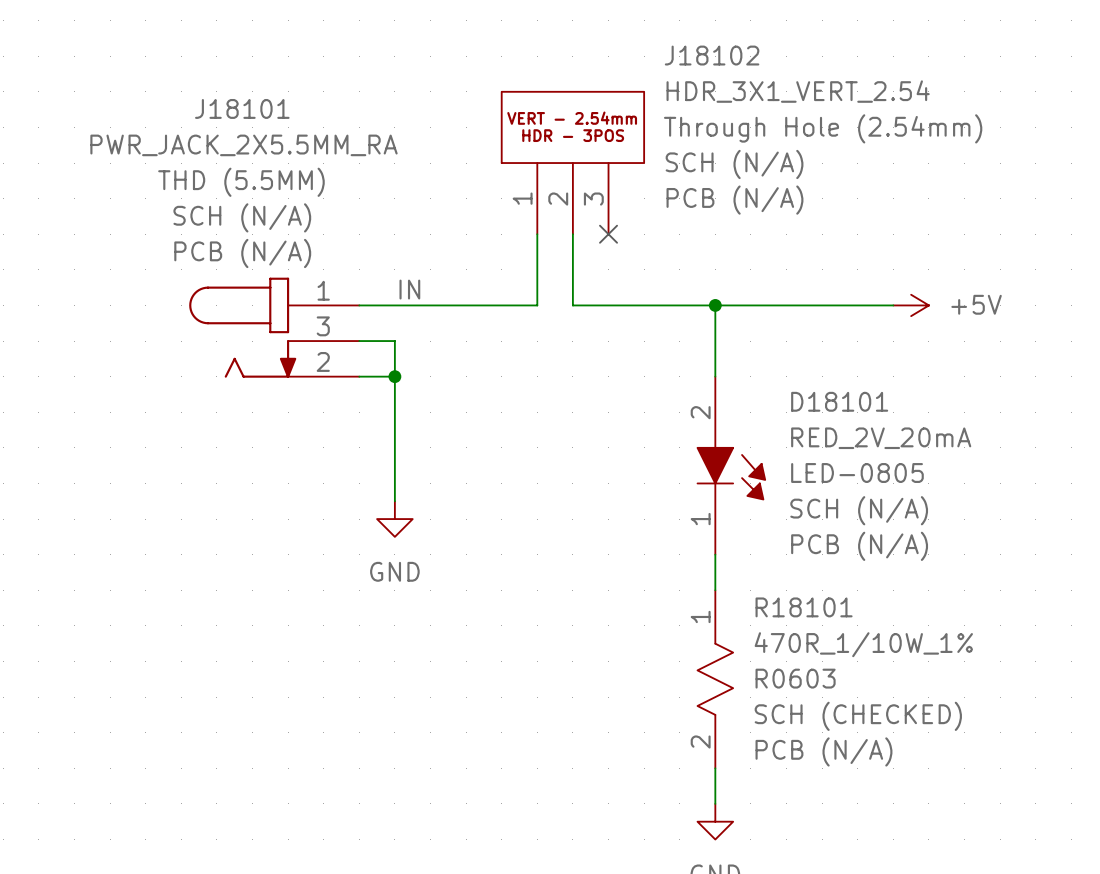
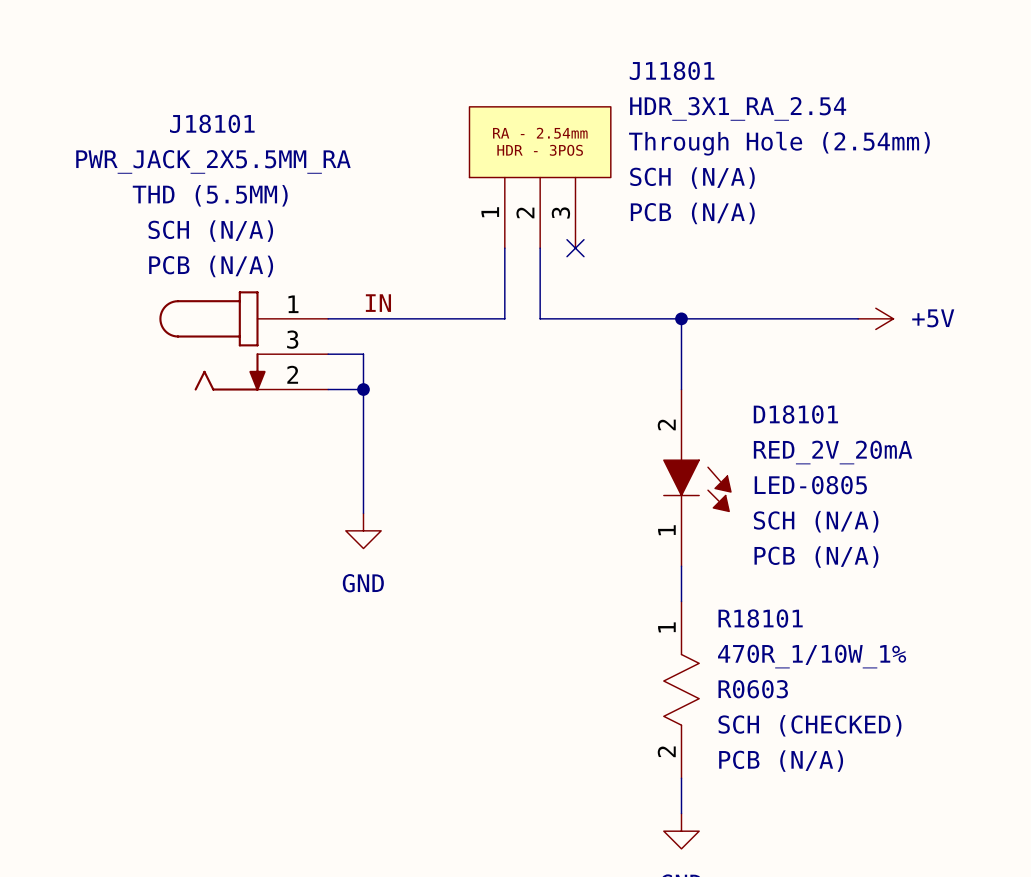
J18102 name: J18102 (712, 55) -> J11801 (672, 70)
J18102 value: HDR_3X1_VERT_2.54 (798, 91) -> HDR_3X1_RA_2.54 (738, 108)
J18102 text: VERT - 2.54mm (572, 118) -> RA - 2.54mm (540, 133)

